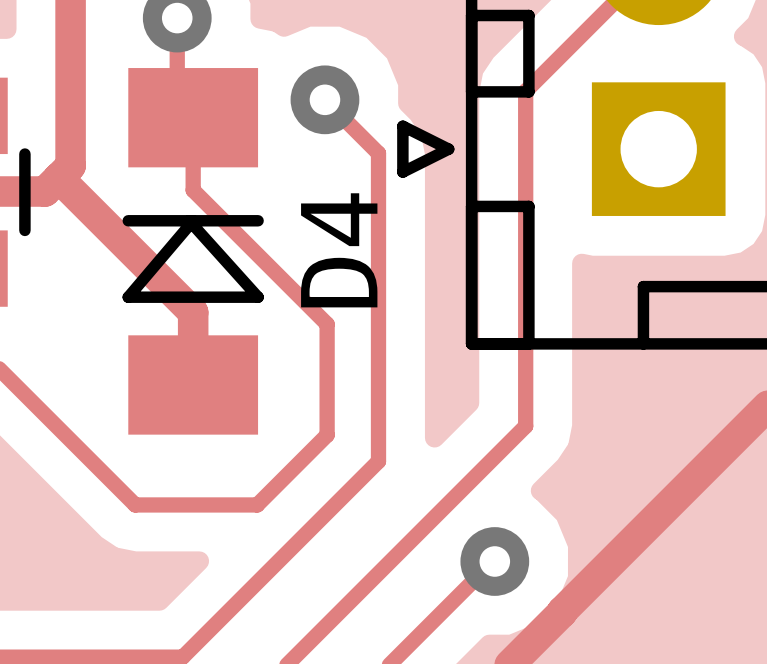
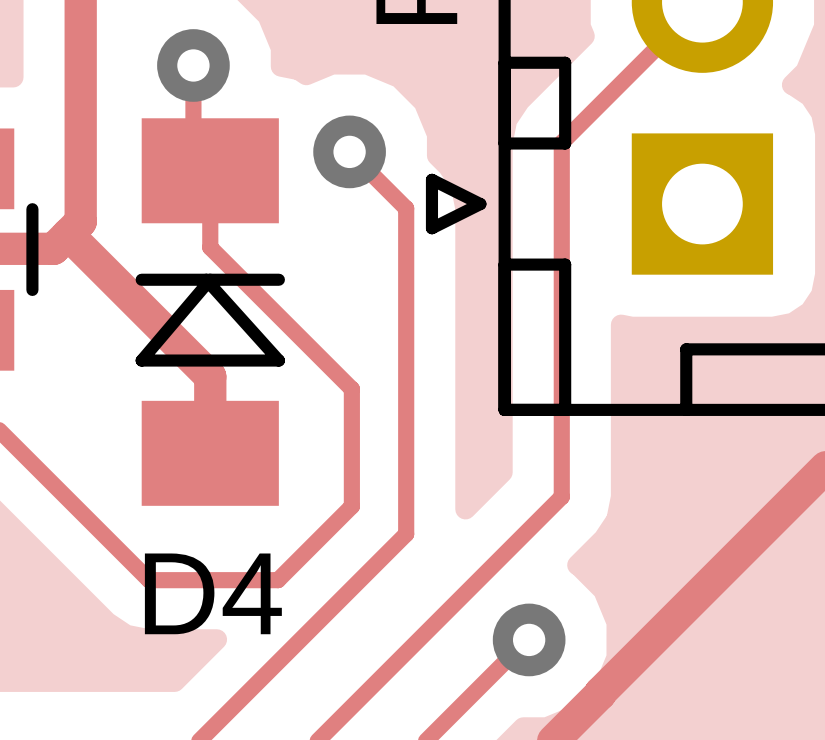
D4 name rotation: 0° (339, 250) -> 90° clockwise (213, 593)
D4 name position: D4 (339, 250) -> D4 (213, 593)

